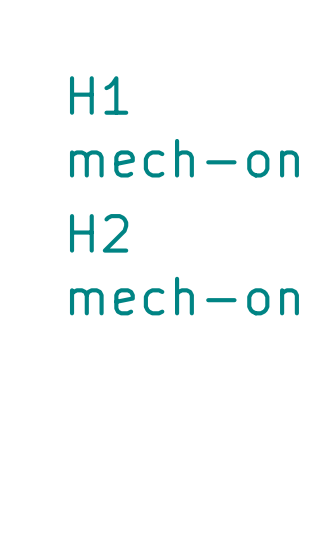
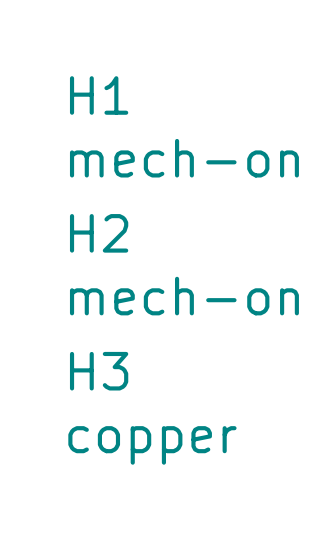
H3: none -> copper (152, 408)

